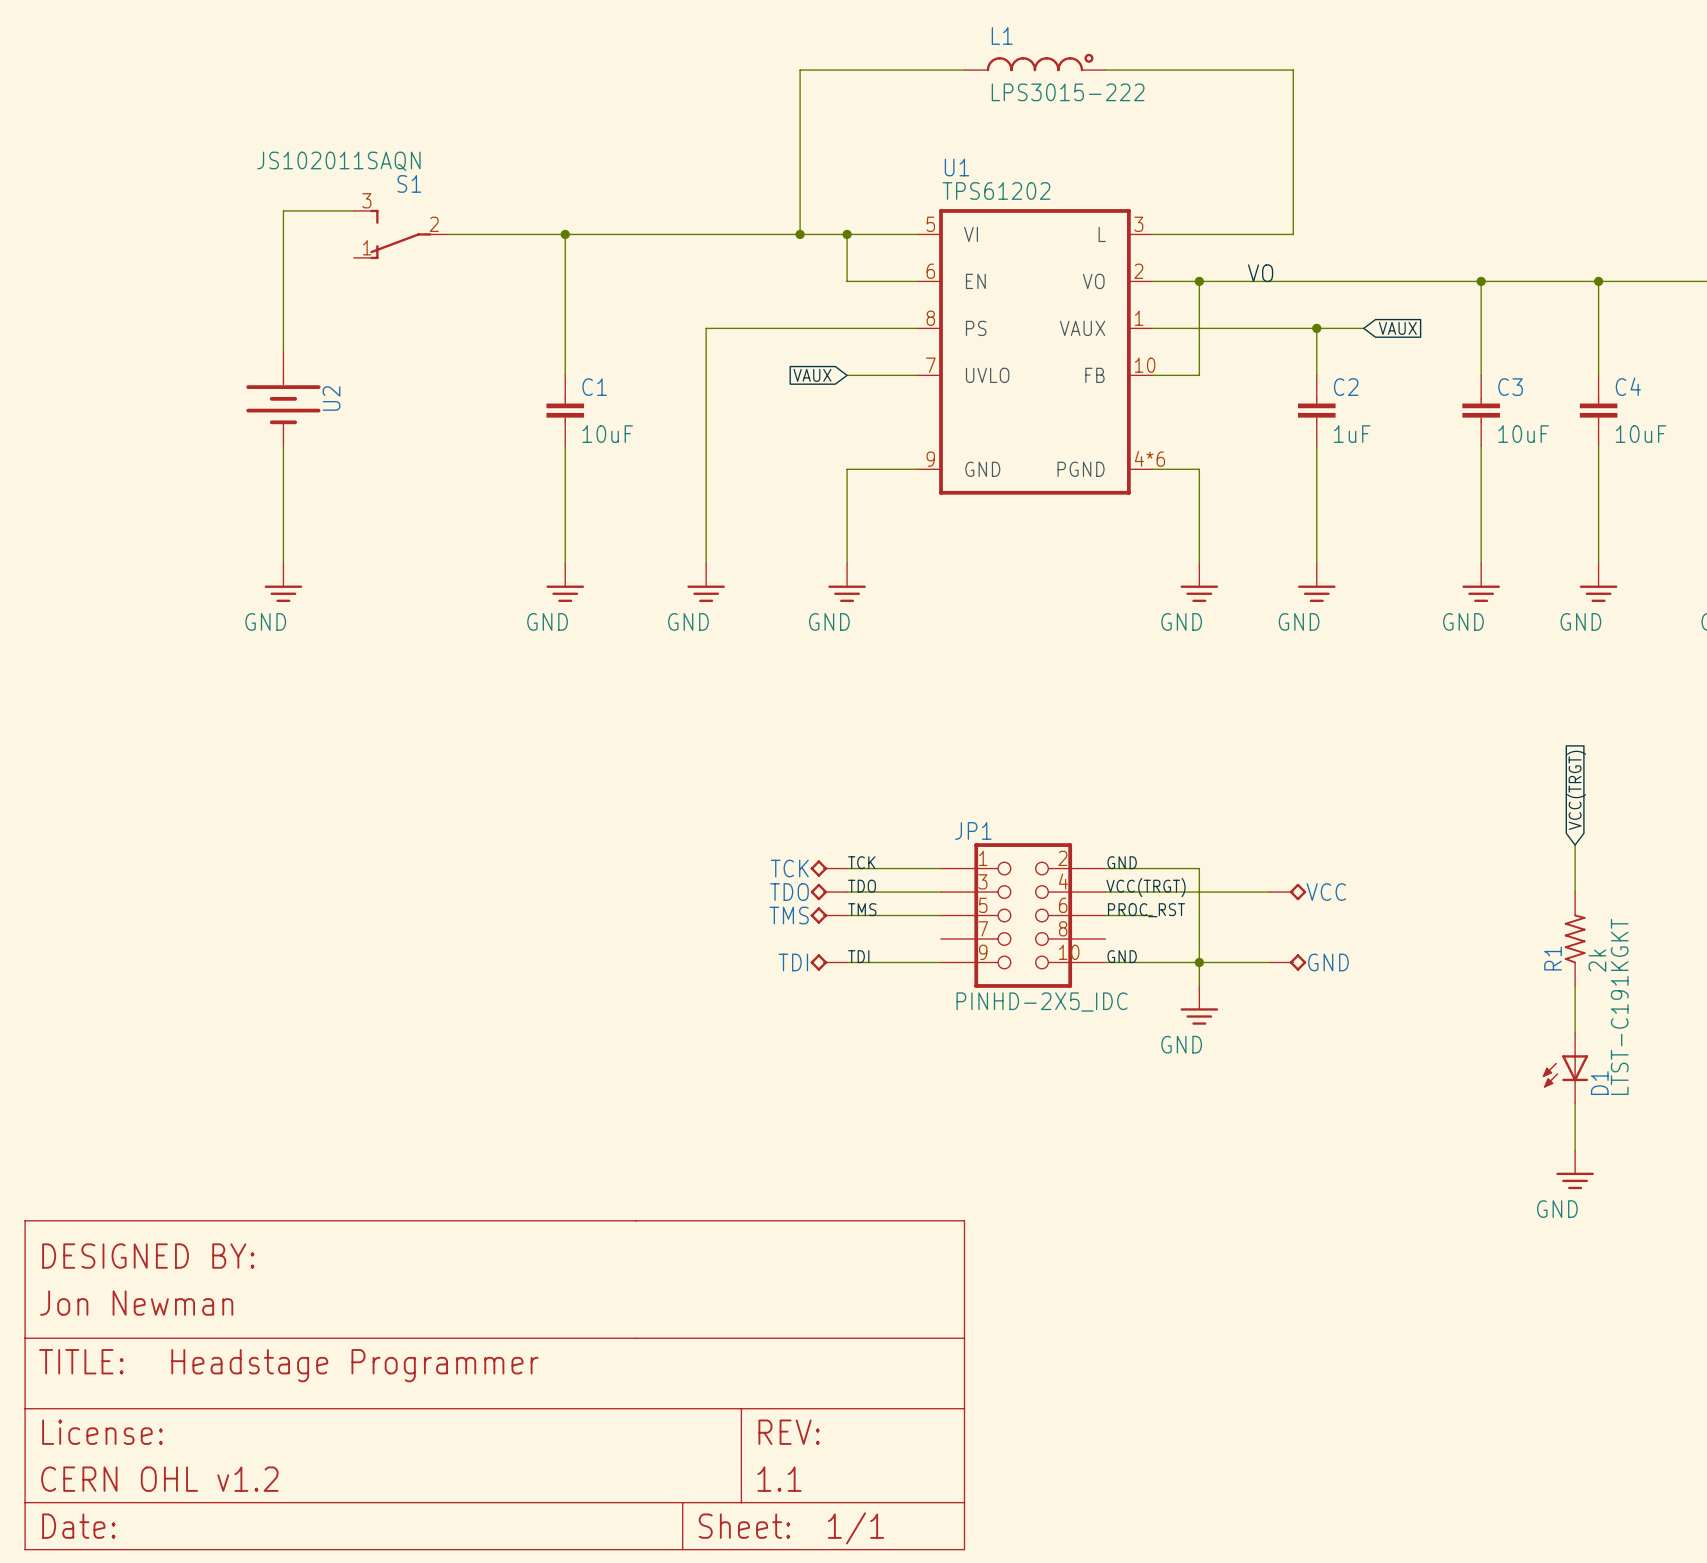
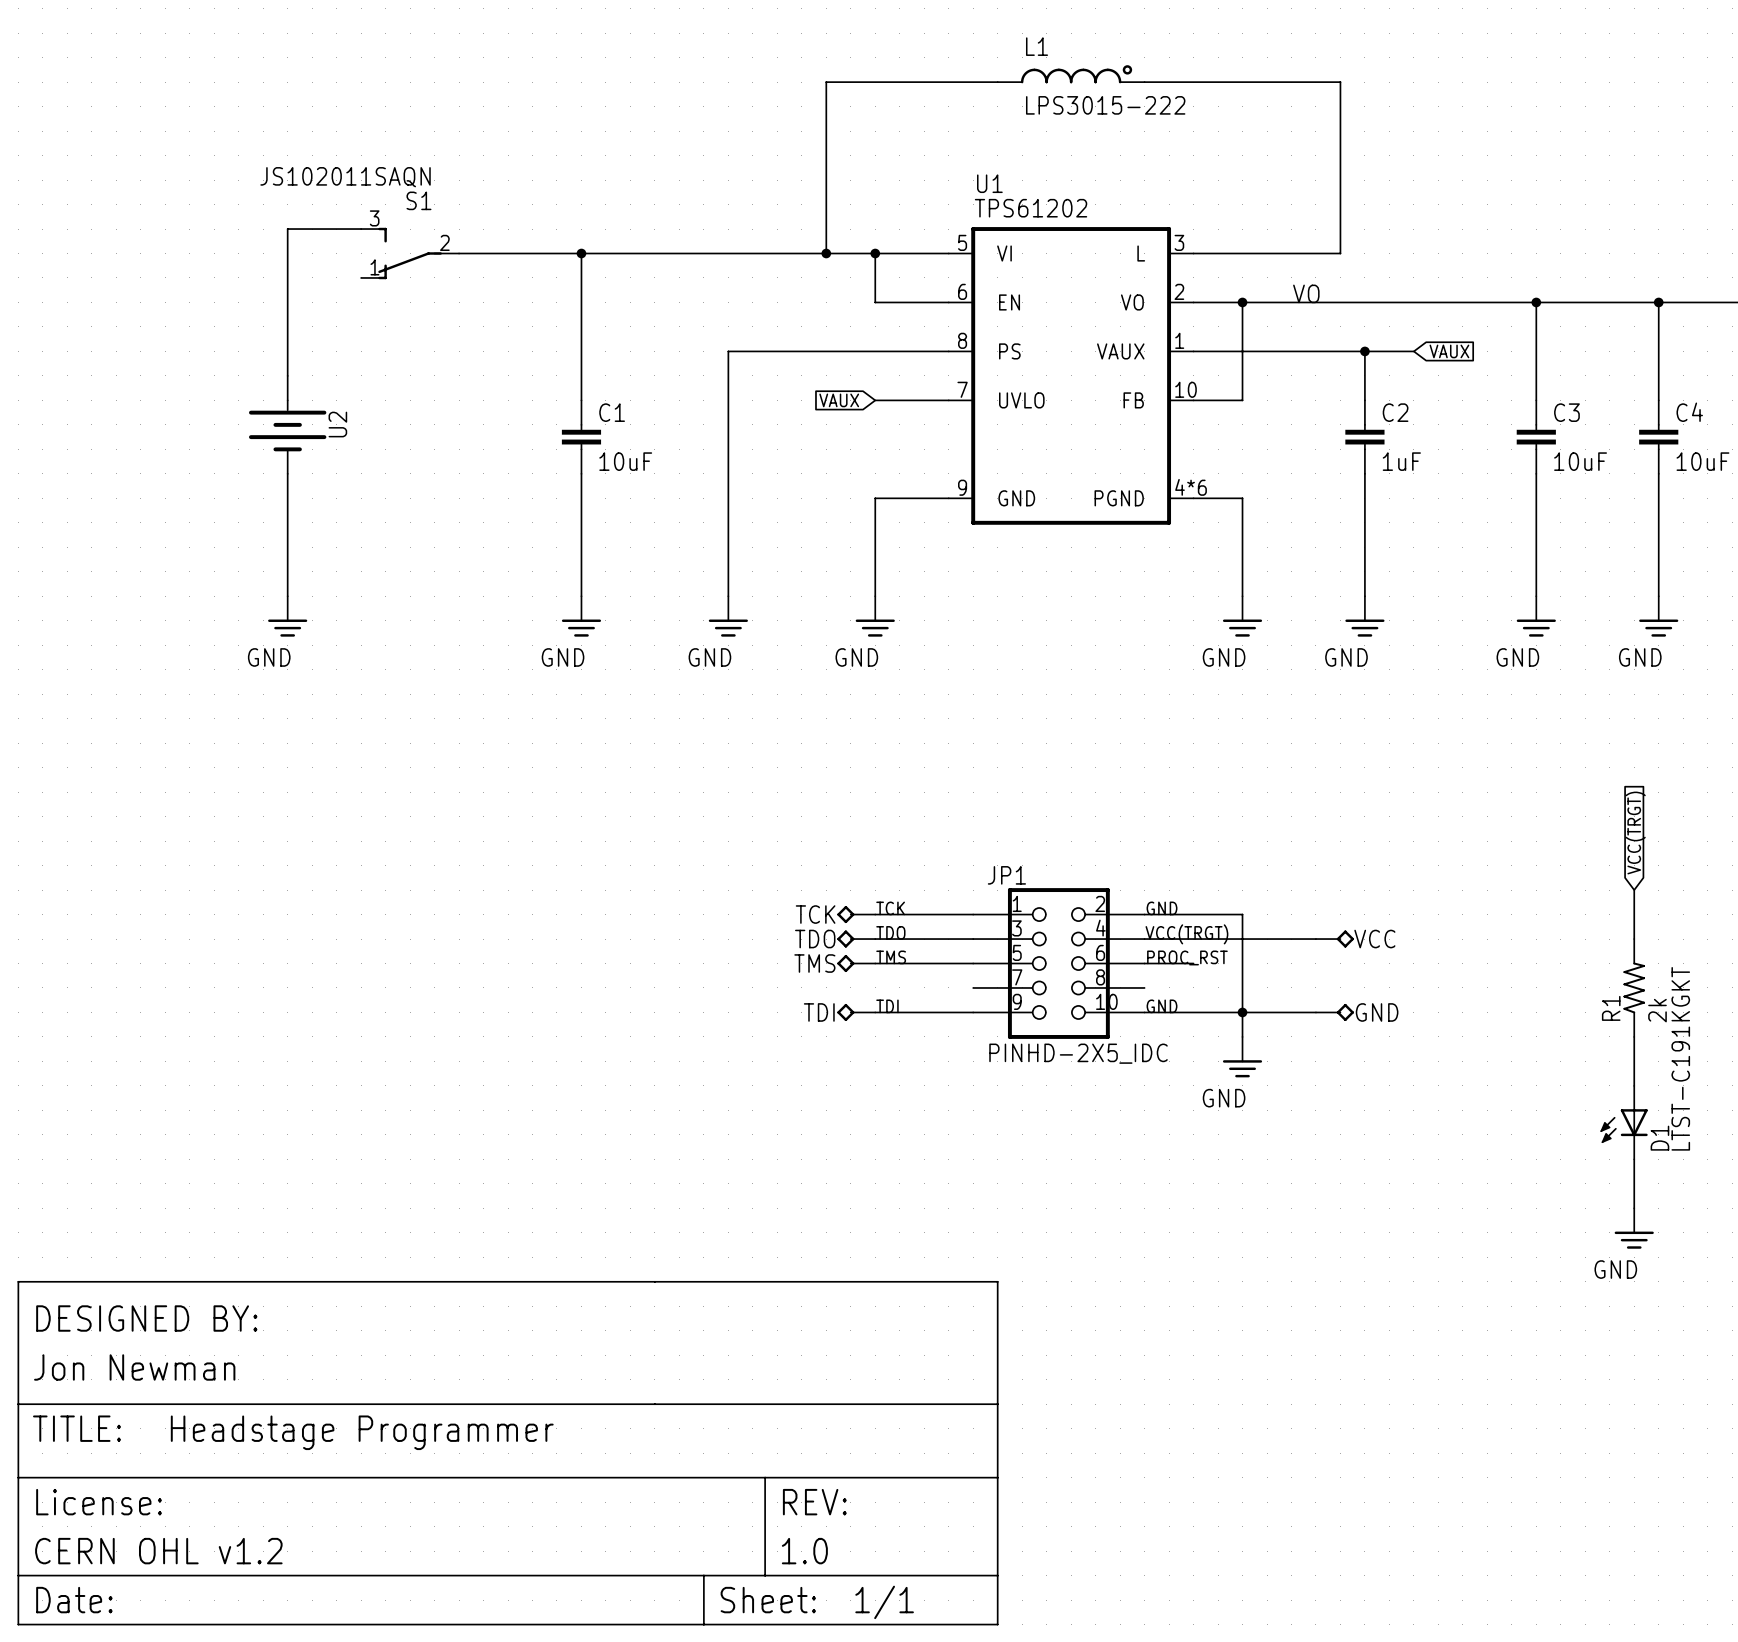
part text: 1.1 (779, 1479) -> 1.0 (804, 1551)

